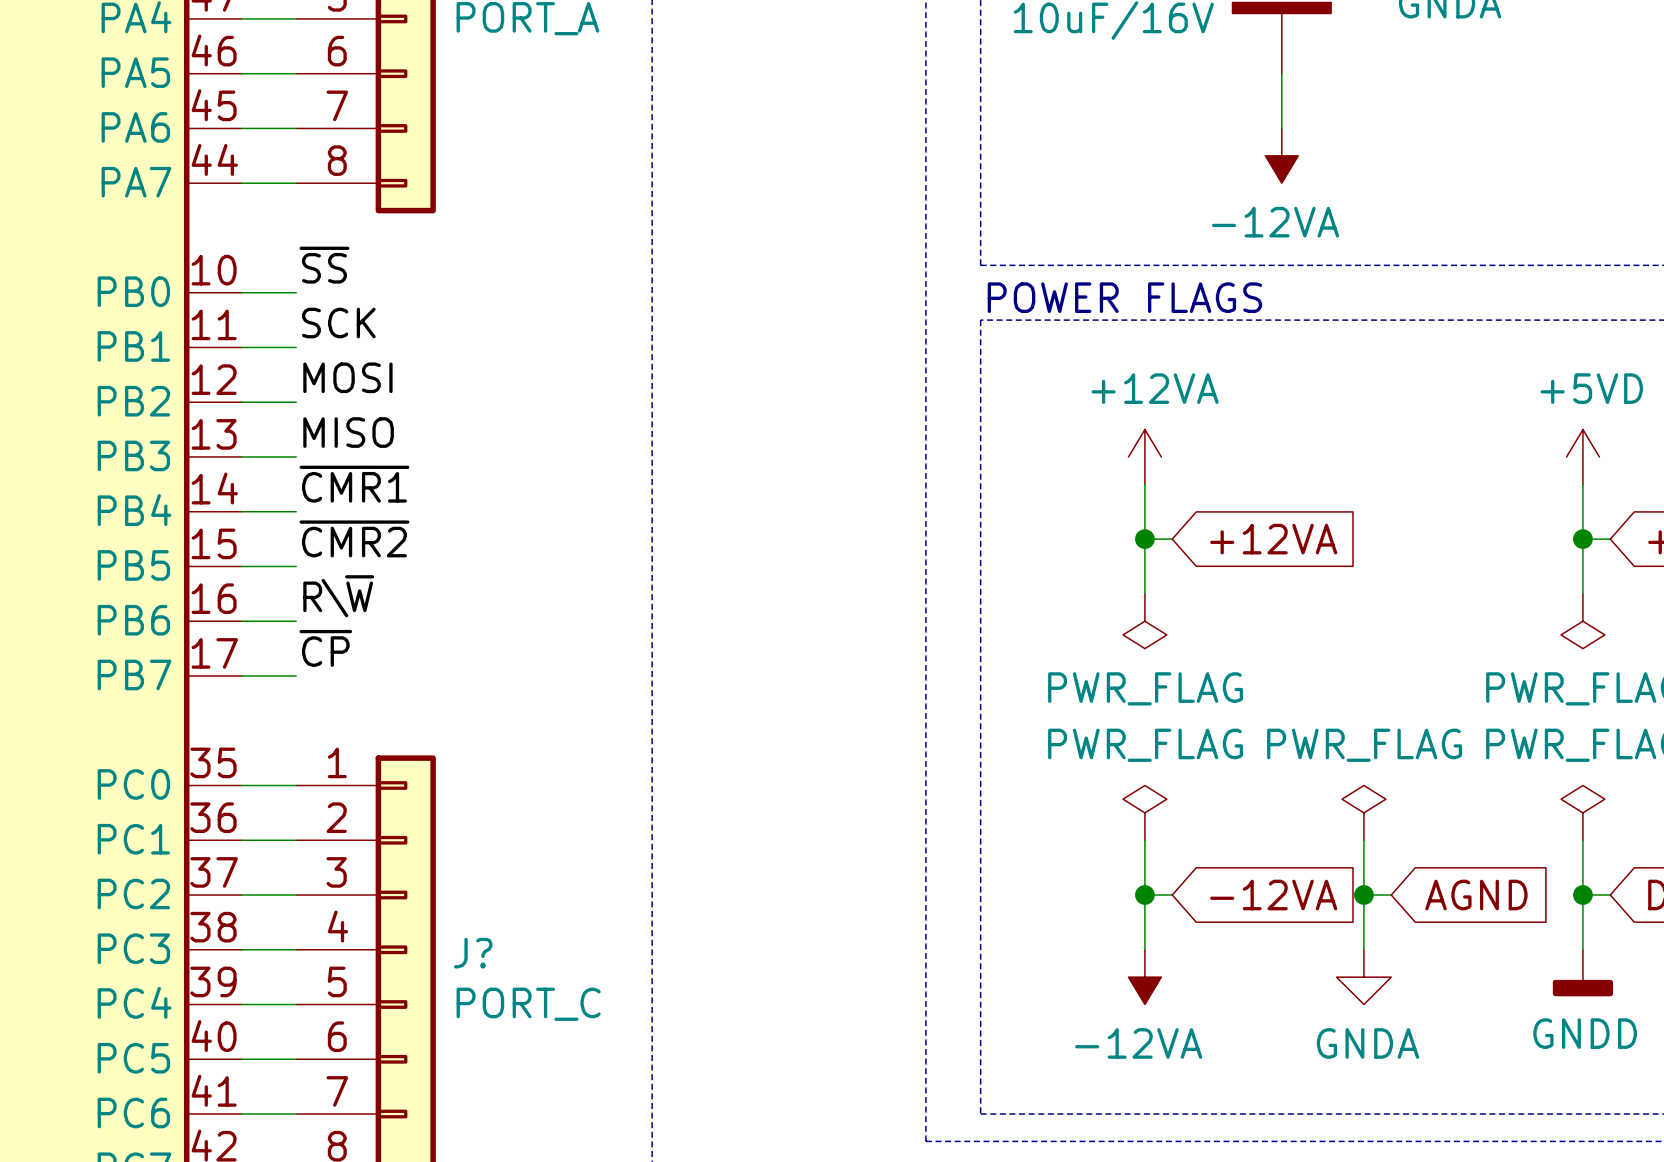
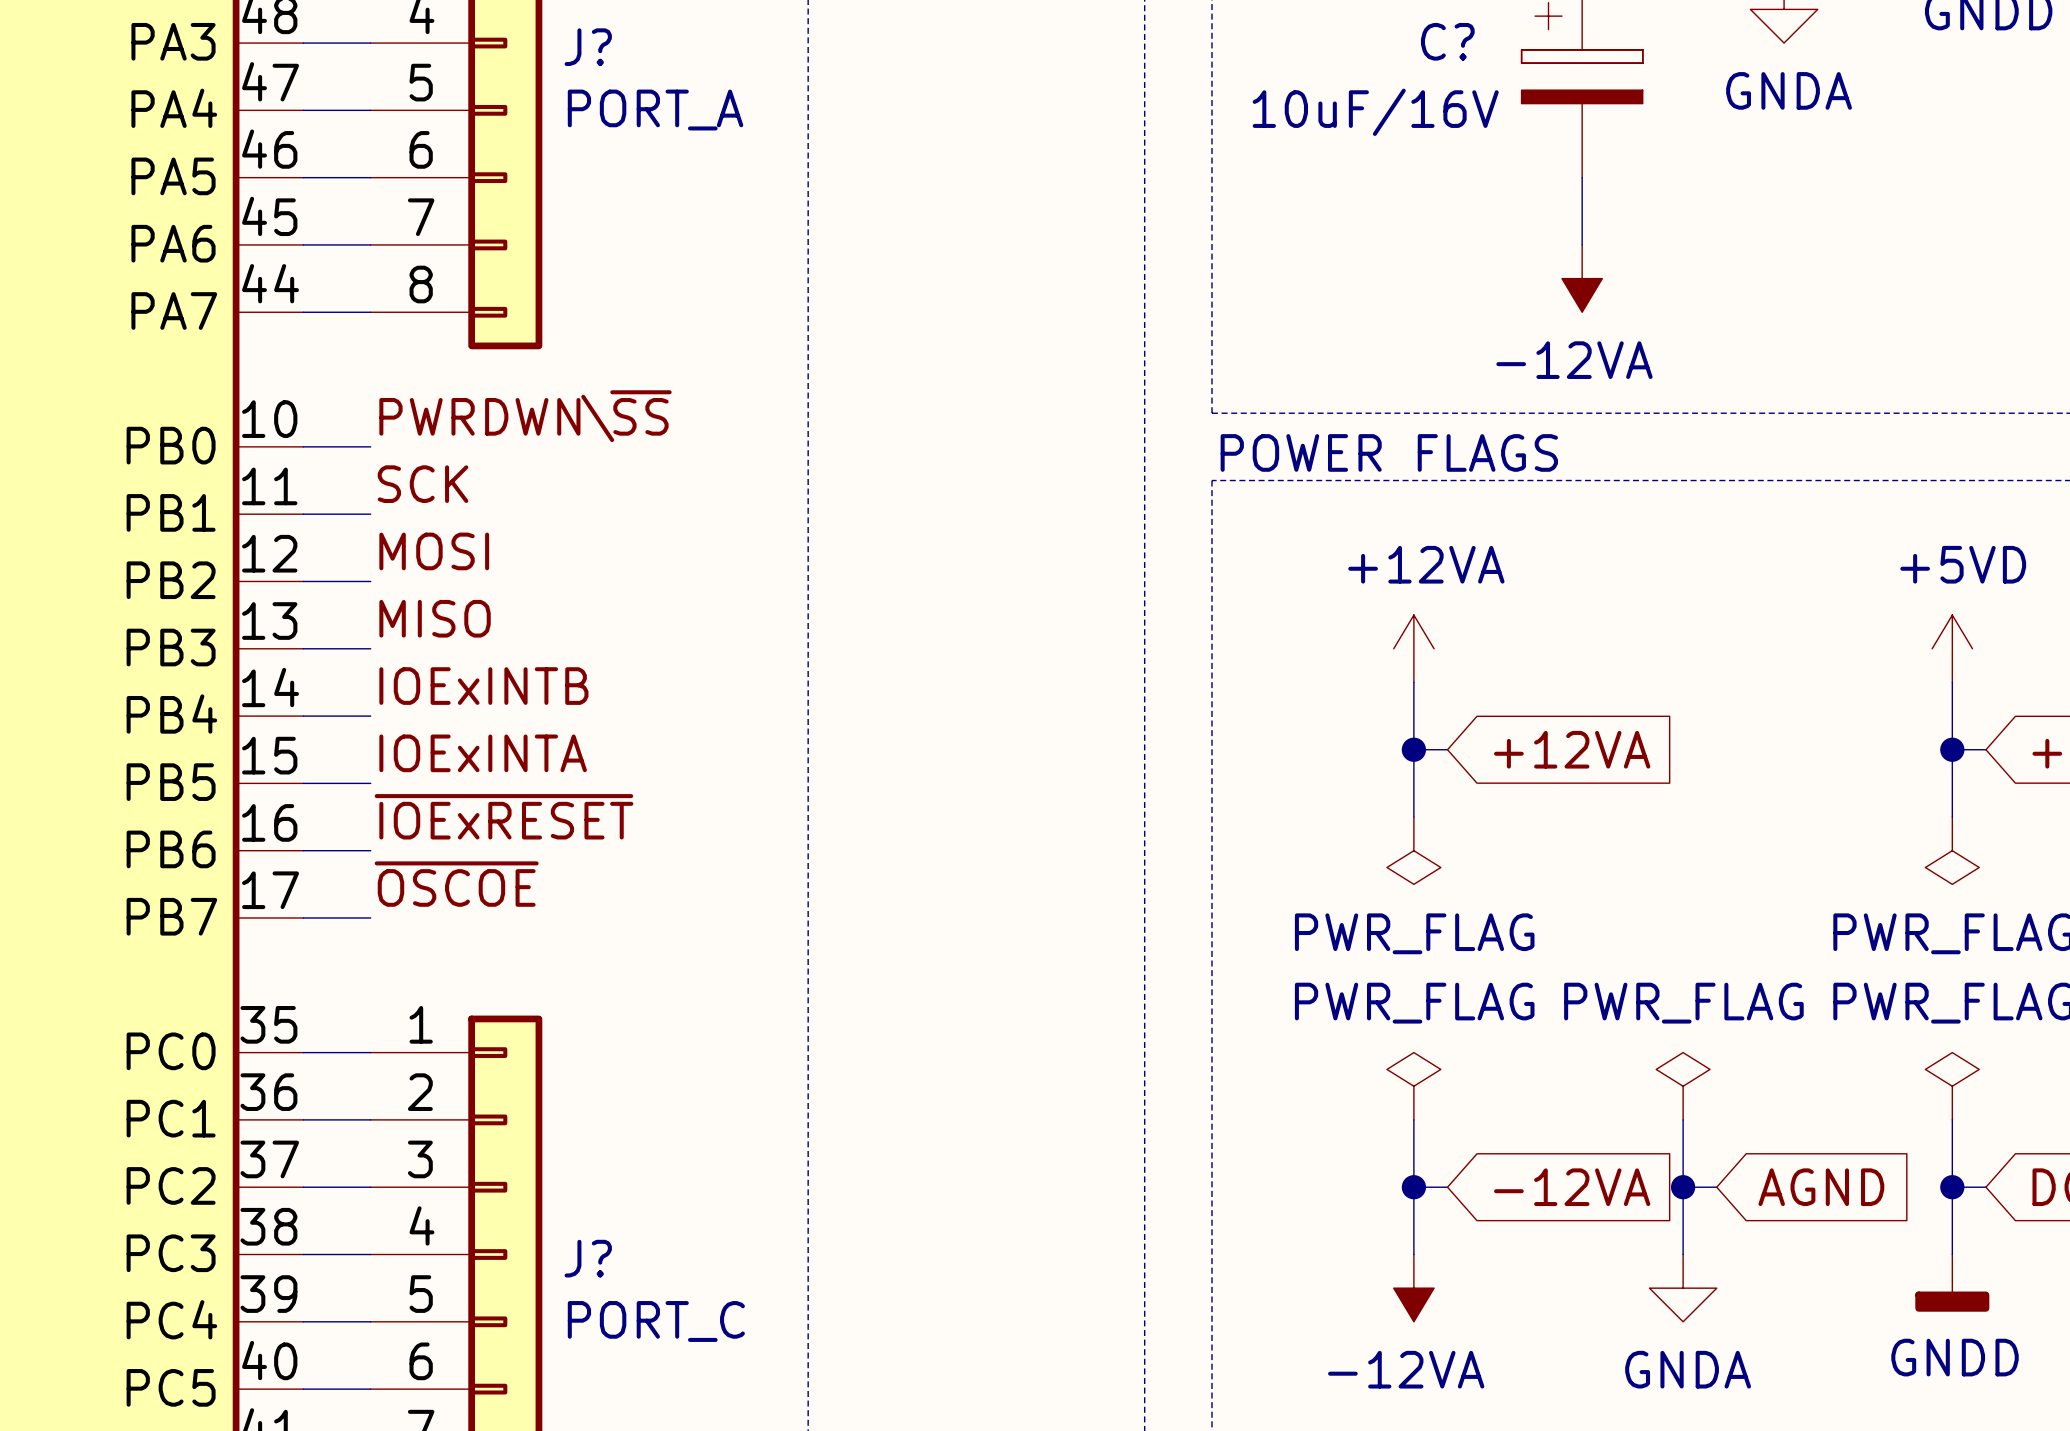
label: ~{SS} (324, 265) -> PWRDWN\~{SS} (525, 416)
label: ~{CMR1} (354, 484) -> IOExINTB (483, 686)
label: ~{CMR2} (354, 538) -> IOExINTA (483, 753)
label: R\~{W} (338, 596) -> ~{IOExRESET} (504, 816)
label: ~{CP} (325, 648) -> ~{OSCOE} (456, 884)

